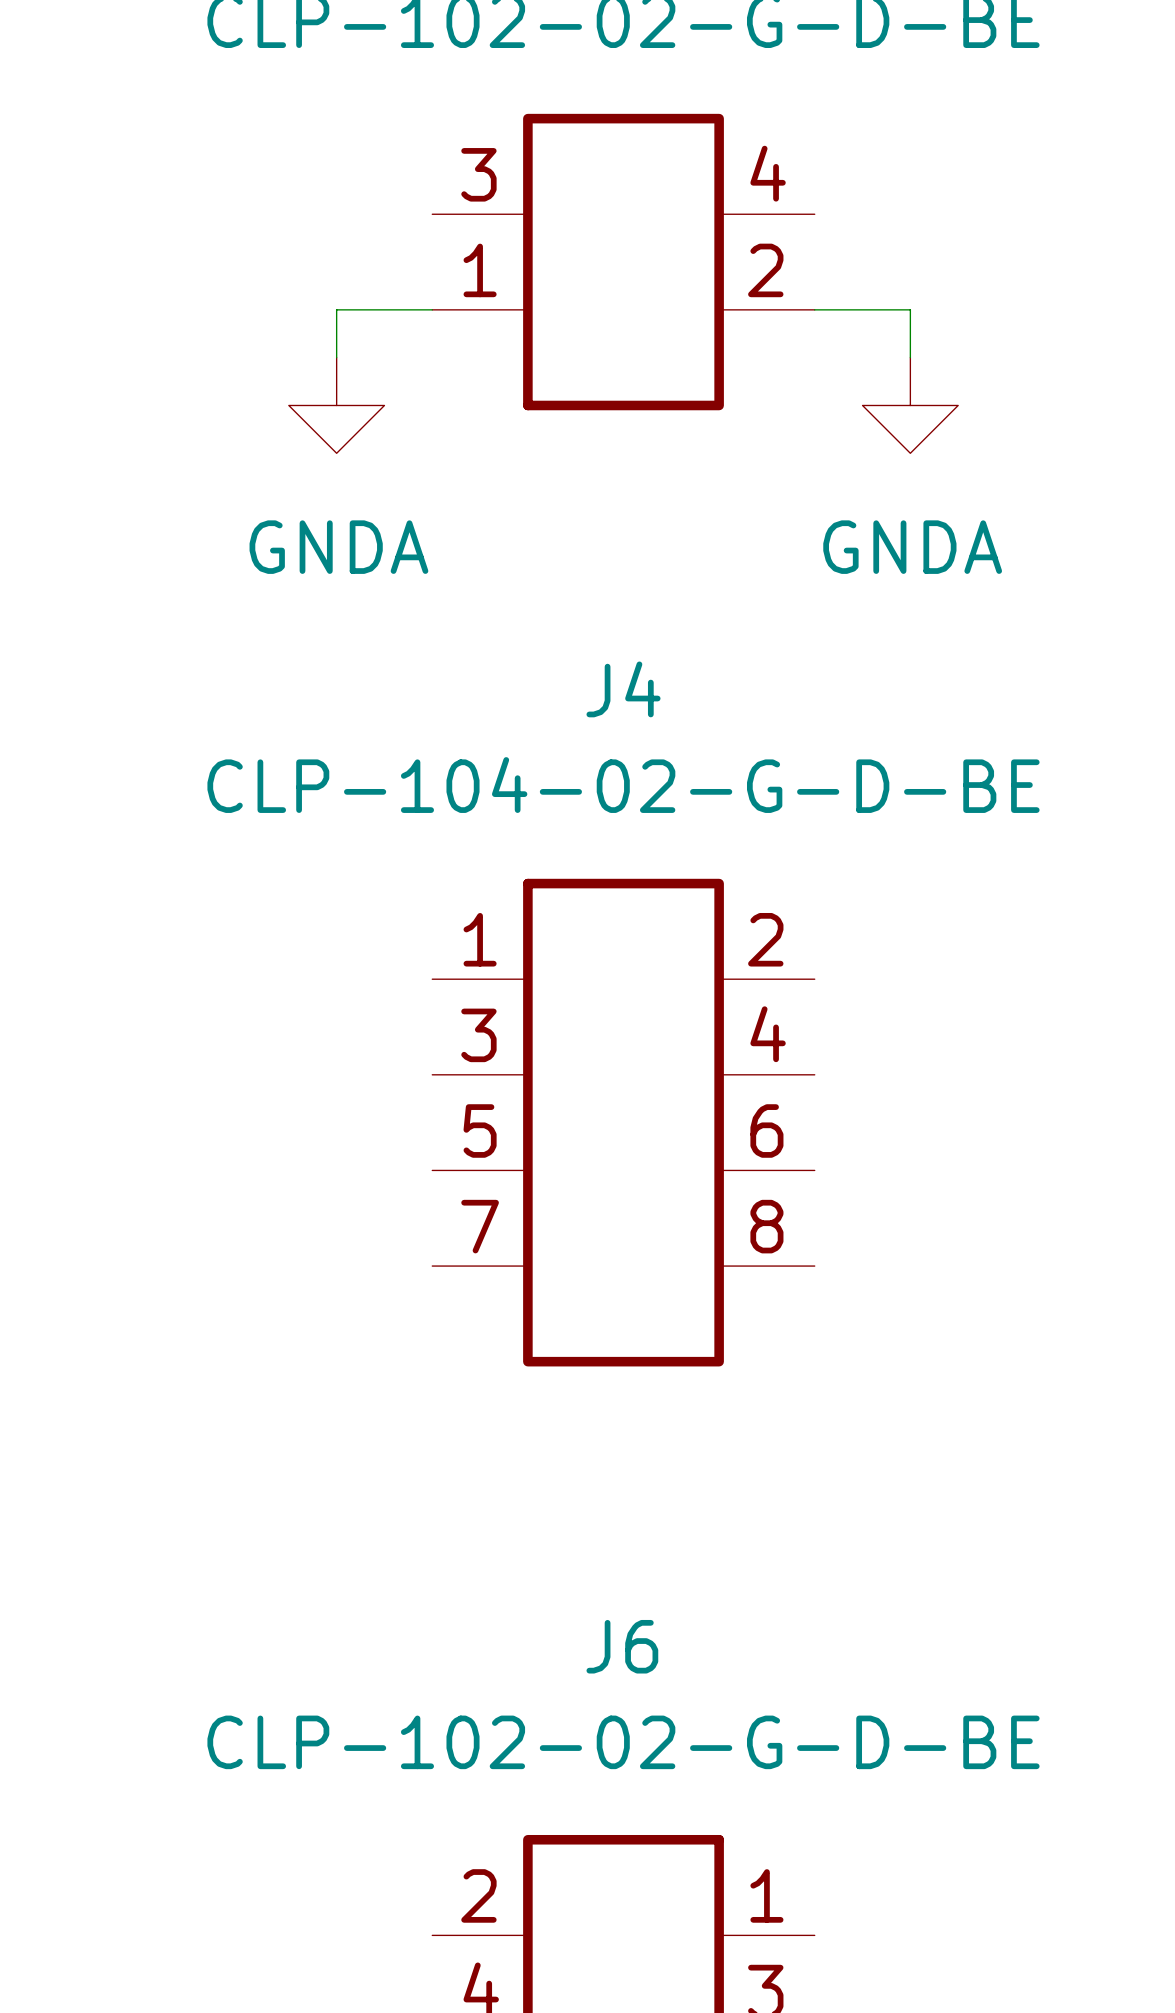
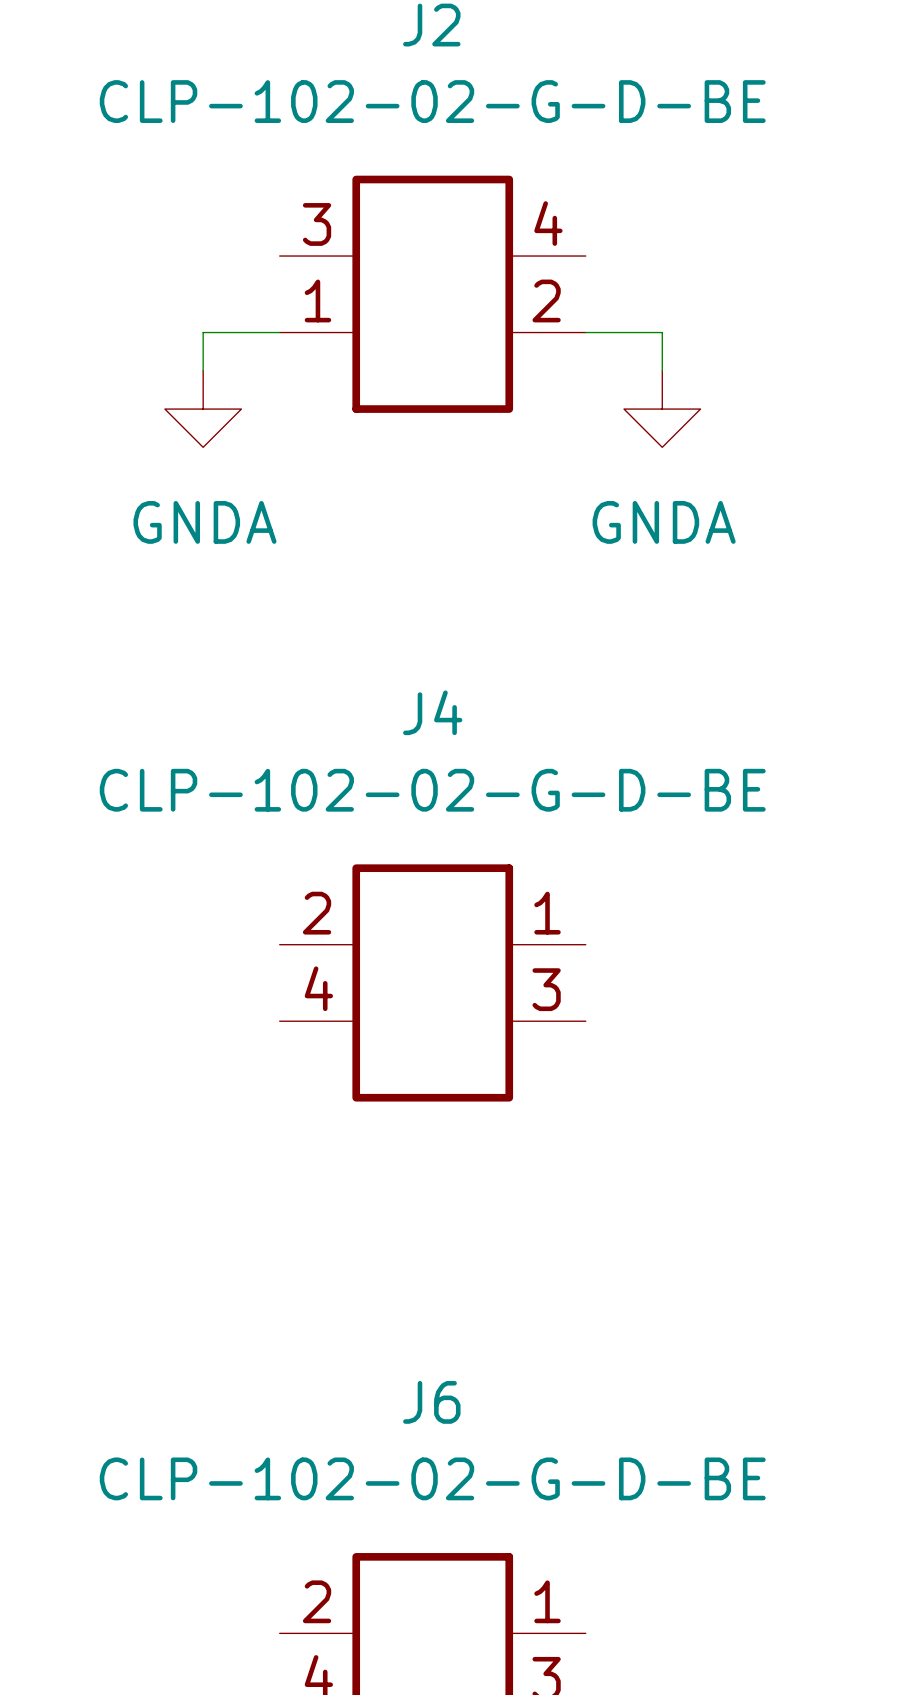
J4 name position: J4 (623, 689) -> J4 (432, 712)
J4 value: CLP-104-02-G-D-BE (623, 785) -> CLP-102-02-G-D-BE (432, 790)
J4 symbol: [432, 878, 815, 1367] -> [279, 864, 586, 1102]

